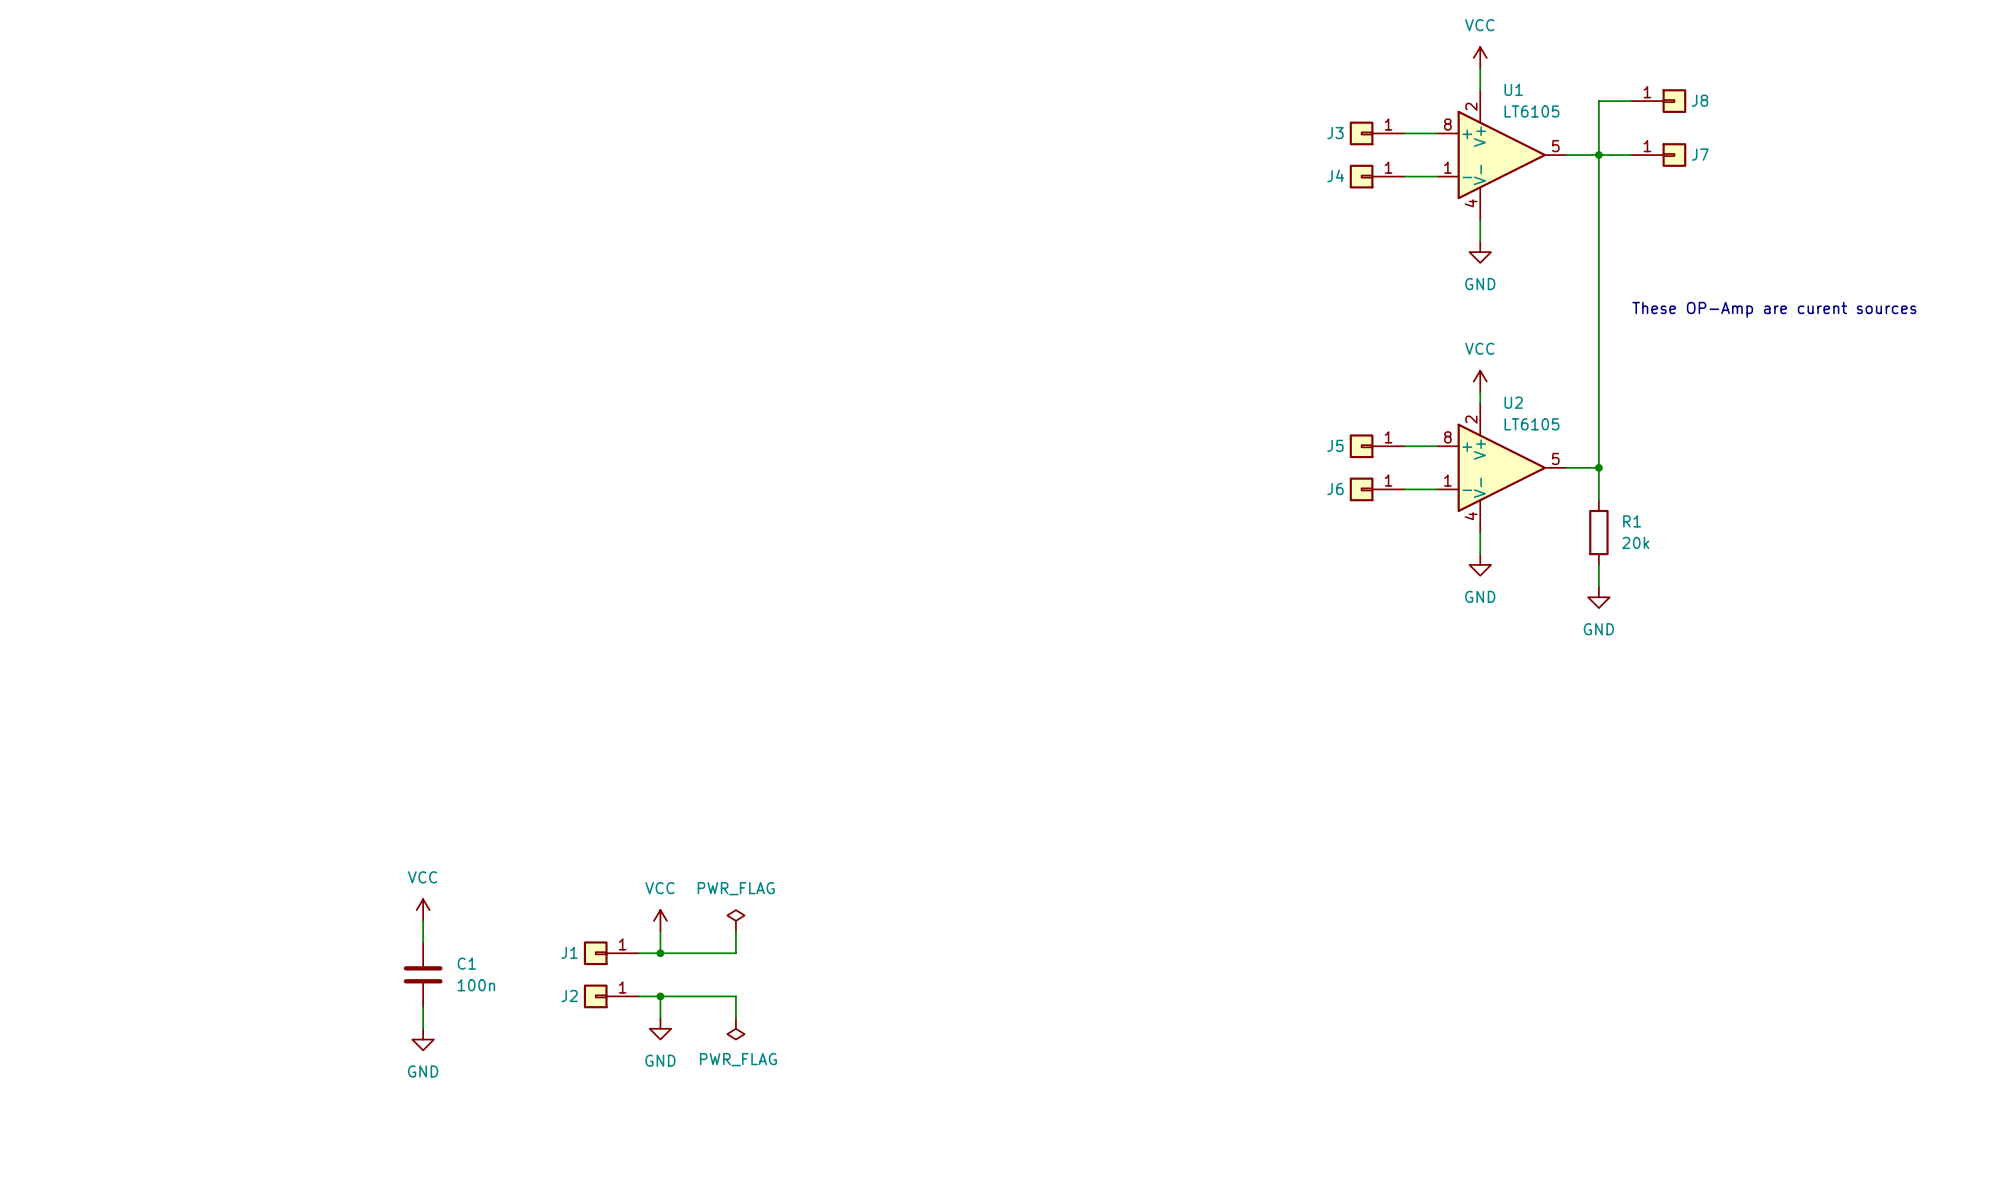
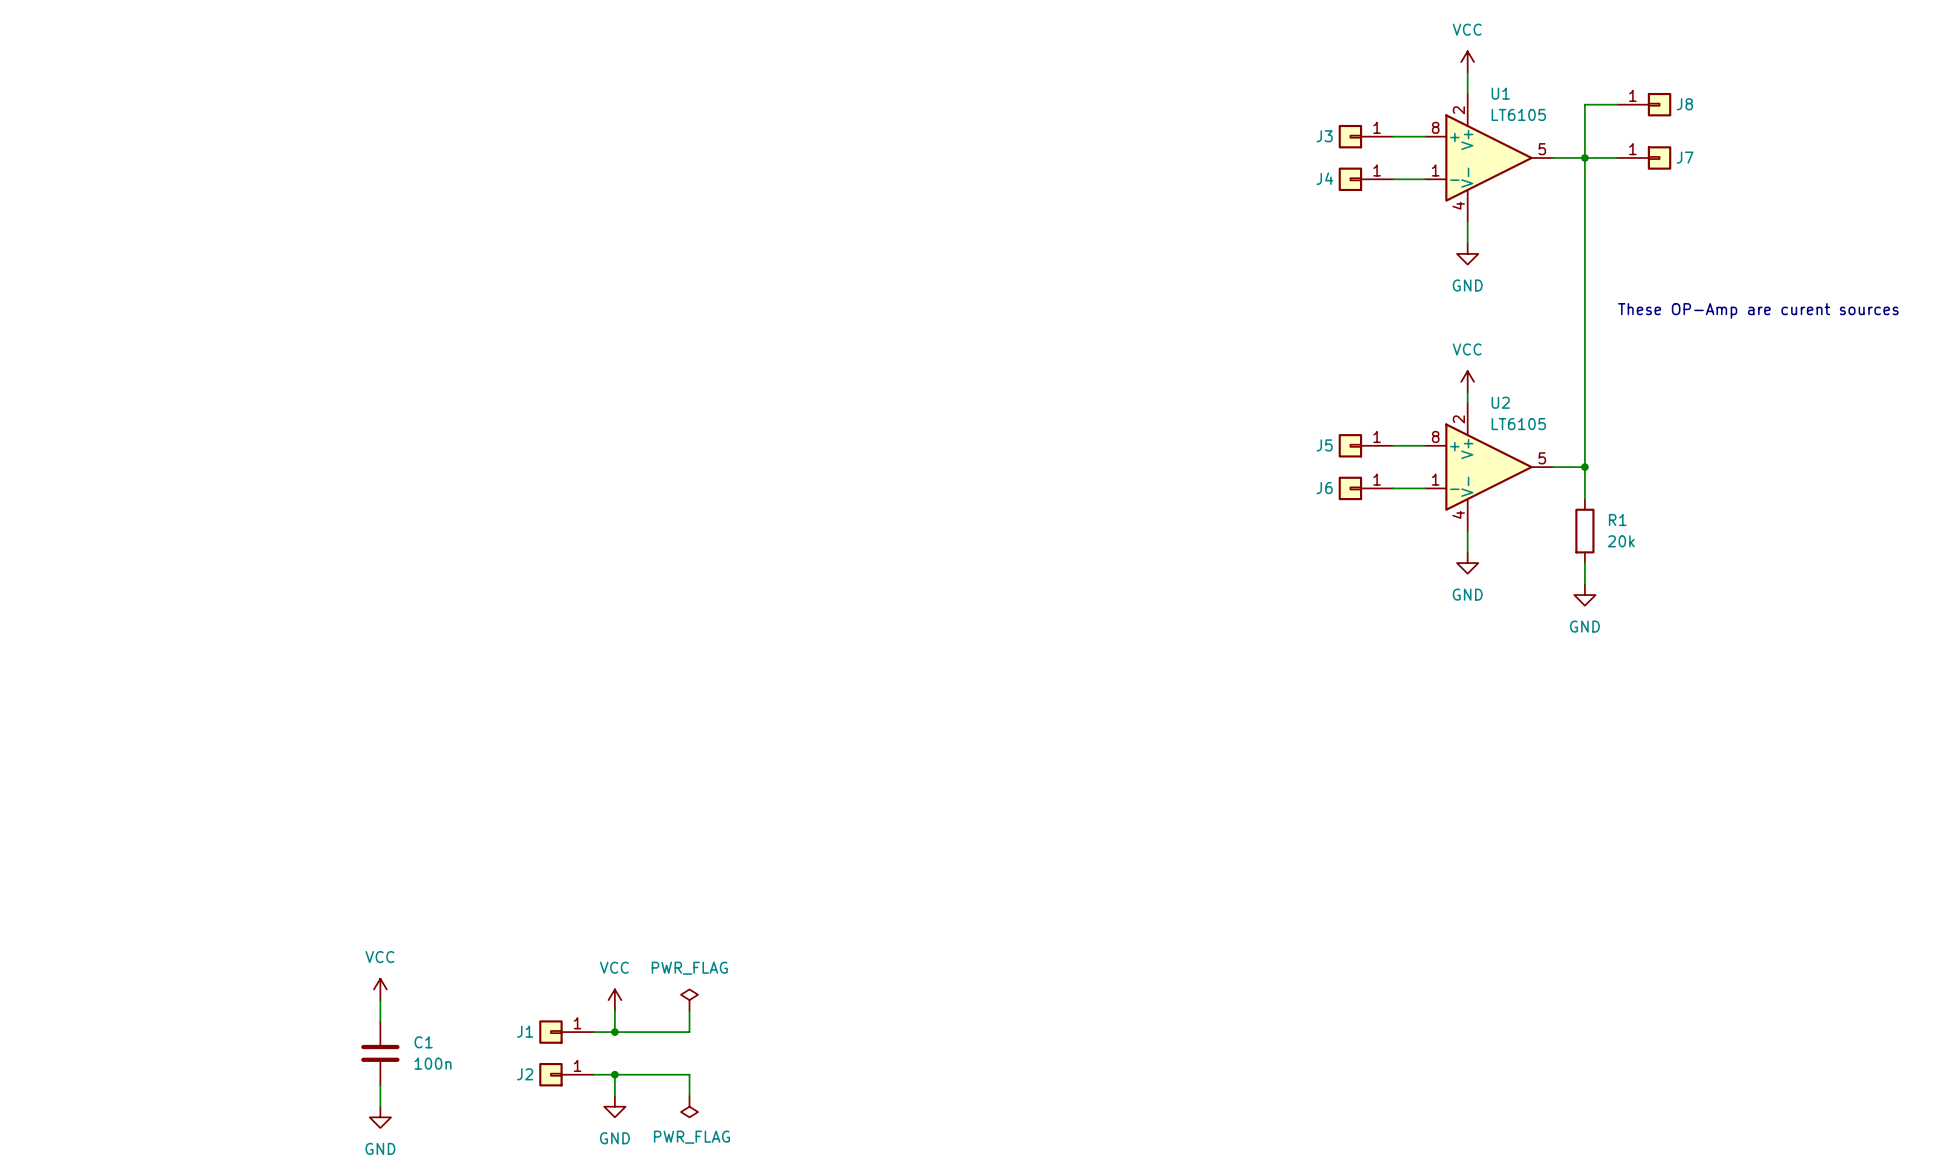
power symbol position: VCC (423, 910) -> VCC (380, 989)
wire: (423, 920) (423, 942) -> (380, 1000) (380, 1021)
power symbol position: VCC (660, 920) -> VCC (614, 1000)
power symbol: PWR_FLAG (735, 920) -> none
wire: (660, 931) (660, 953) -> (614, 1010) (614, 1032)
wire: (735, 931) (735, 953) (638, 953) -> (689, 1010) (689, 1032) (593, 1032)
J1 position: (611, 953) -> (566, 1032)
junction: (660, 953) -> none
C1 position: (423, 974) -> (380, 1053)
J2 position: (611, 996) -> (566, 1074)
wire: (638, 996) (735, 996) (735, 1017) -> (593, 1074) (689, 1074) (689, 1096)
wire: (660, 996) (660, 1017) -> (614, 1074) (614, 1096)
junction: (660, 996) -> none
wire: (423, 1007) (423, 1028) -> (380, 1085) (380, 1106)
power symbol: none -> PWR_FLAG (689, 1000)
power symbol position: GND (660, 1028) -> GND (614, 1106)
power symbol: PWR_FLAG (735, 1028) -> none
power symbol position: GND (423, 1039) -> GND (380, 1117)
junction: none -> (614, 1032)
junction: none -> (614, 1074)
power symbol: none -> PWR_FLAG (689, 1106)

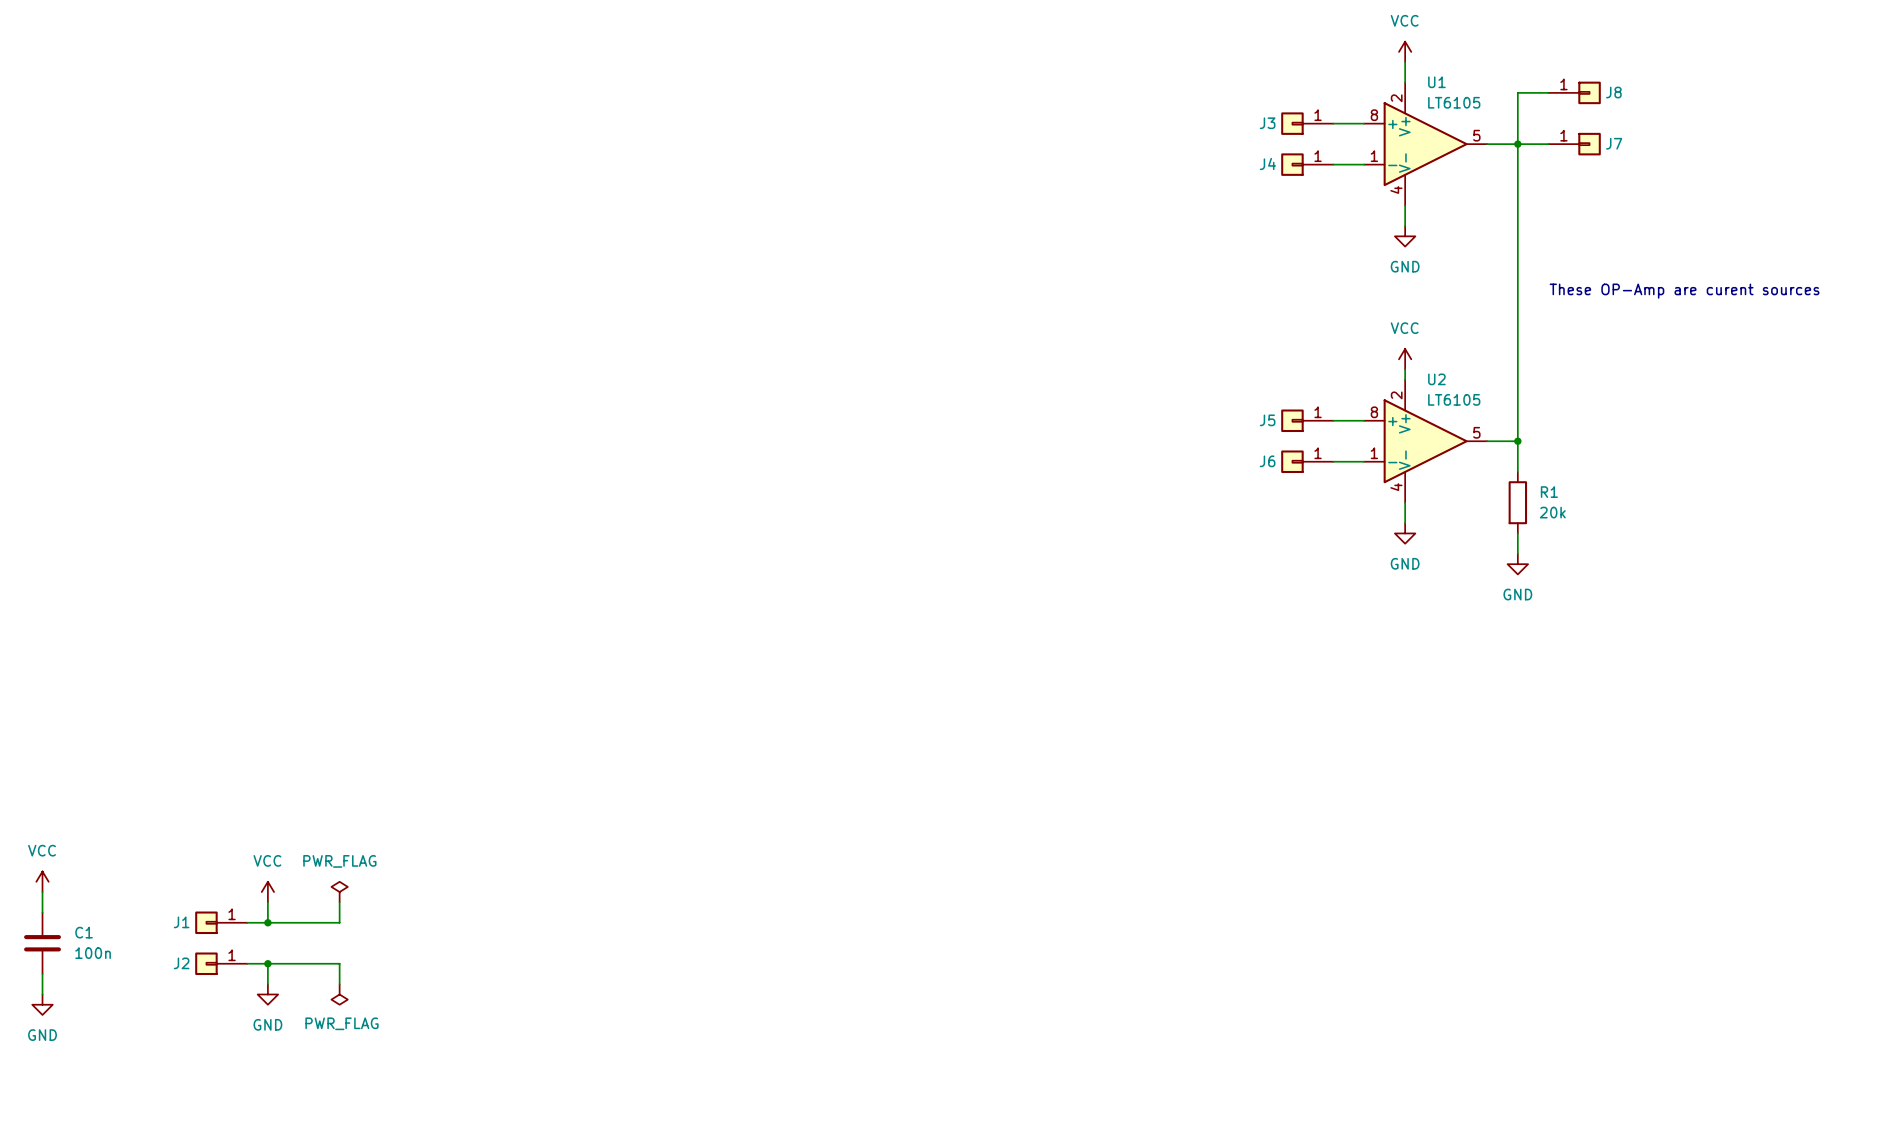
power symbol: none -> VCC (42, 881)
wire: none -> (42, 892) (42, 912)
power symbol: none -> PWR_FLAG (339, 892)
wire: none -> (339, 902) (339, 922) (247, 922)
junction: none -> (267, 922)
power symbol position: VCC (380, 989) -> VCC (267, 892)
wire: (380, 1000) (380, 1021) -> (267, 963) (267, 984)
power symbol: VCC (614, 1000) -> none
power symbol: PWR_FLAG (689, 1000) -> none
wire: none -> (247, 963) (339, 963) (339, 984)
junction: none -> (267, 963)
wire: (614, 1010) (614, 1032) -> none
wire: (689, 1010) (689, 1032) (593, 1032) -> none
wire: none -> (42, 974) (42, 994)
J1 position: (566, 1032) -> (221, 922)
junction: (614, 1032) -> none
power symbol: none -> PWR_FLAG (339, 994)
power symbol: none -> GND (42, 1004)
C1 position: (380, 1053) -> (42, 943)
J2 position: (566, 1074) -> (221, 963)
wire: (593, 1074) (689, 1074) (689, 1096) -> none
wire: (614, 1074) (614, 1096) -> none
junction: (614, 1074) -> none
wire: (380, 1085) (380, 1106) -> (267, 902) (267, 922)
power symbol: GND (614, 1106) -> none
power symbol: PWR_FLAG (689, 1106) -> none
power symbol position: GND (380, 1117) -> GND (267, 994)

